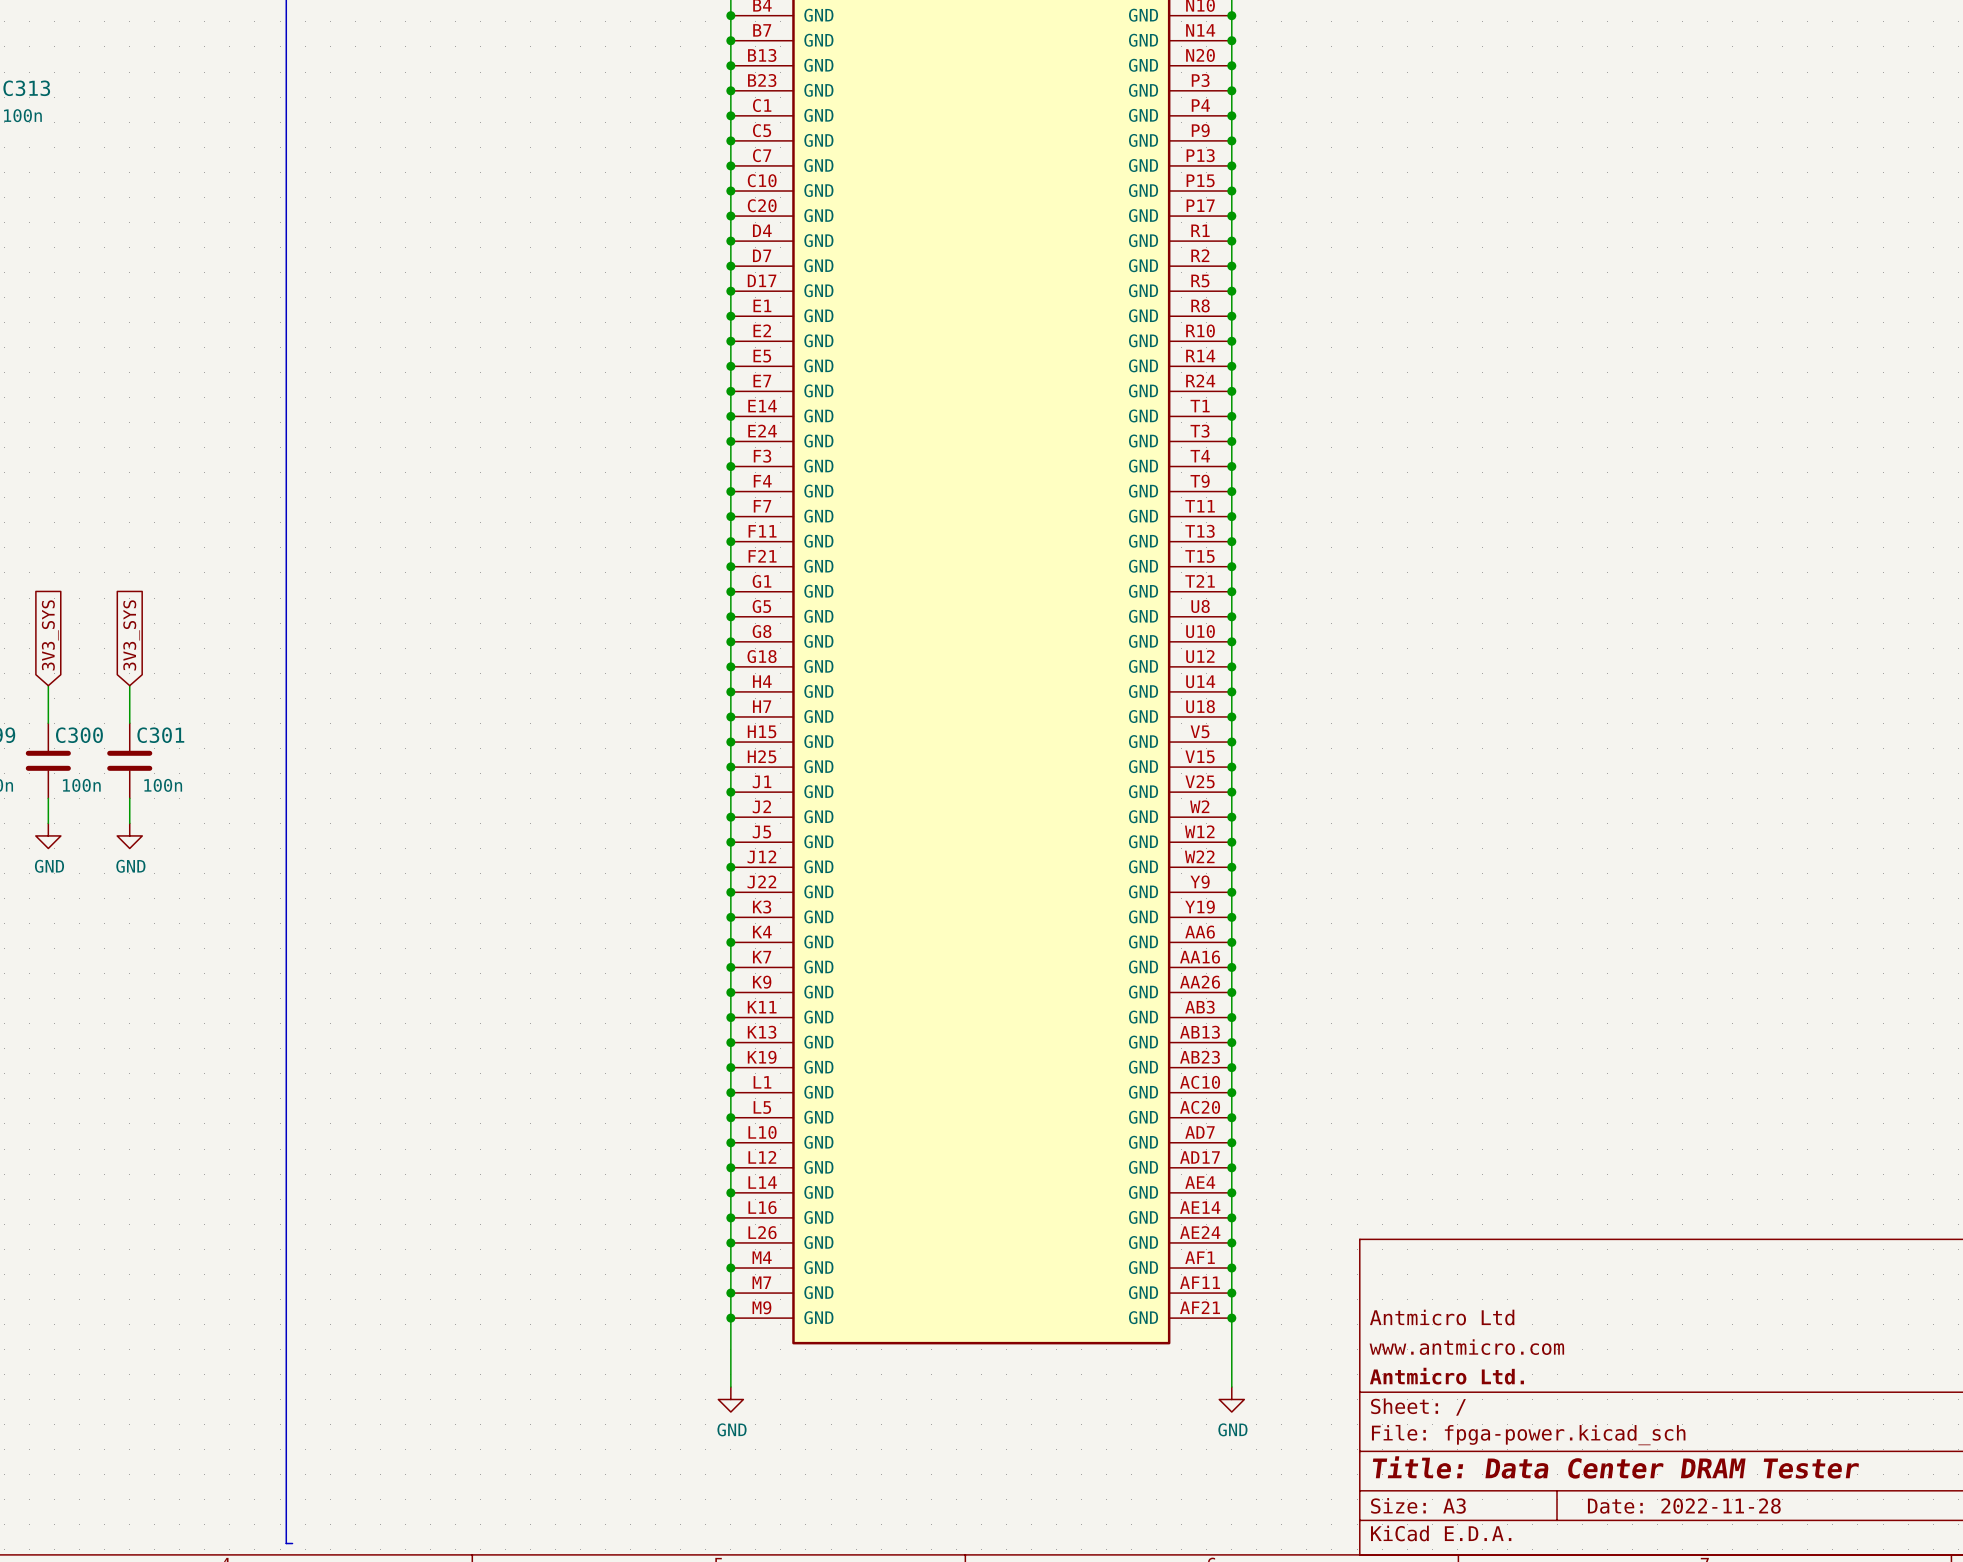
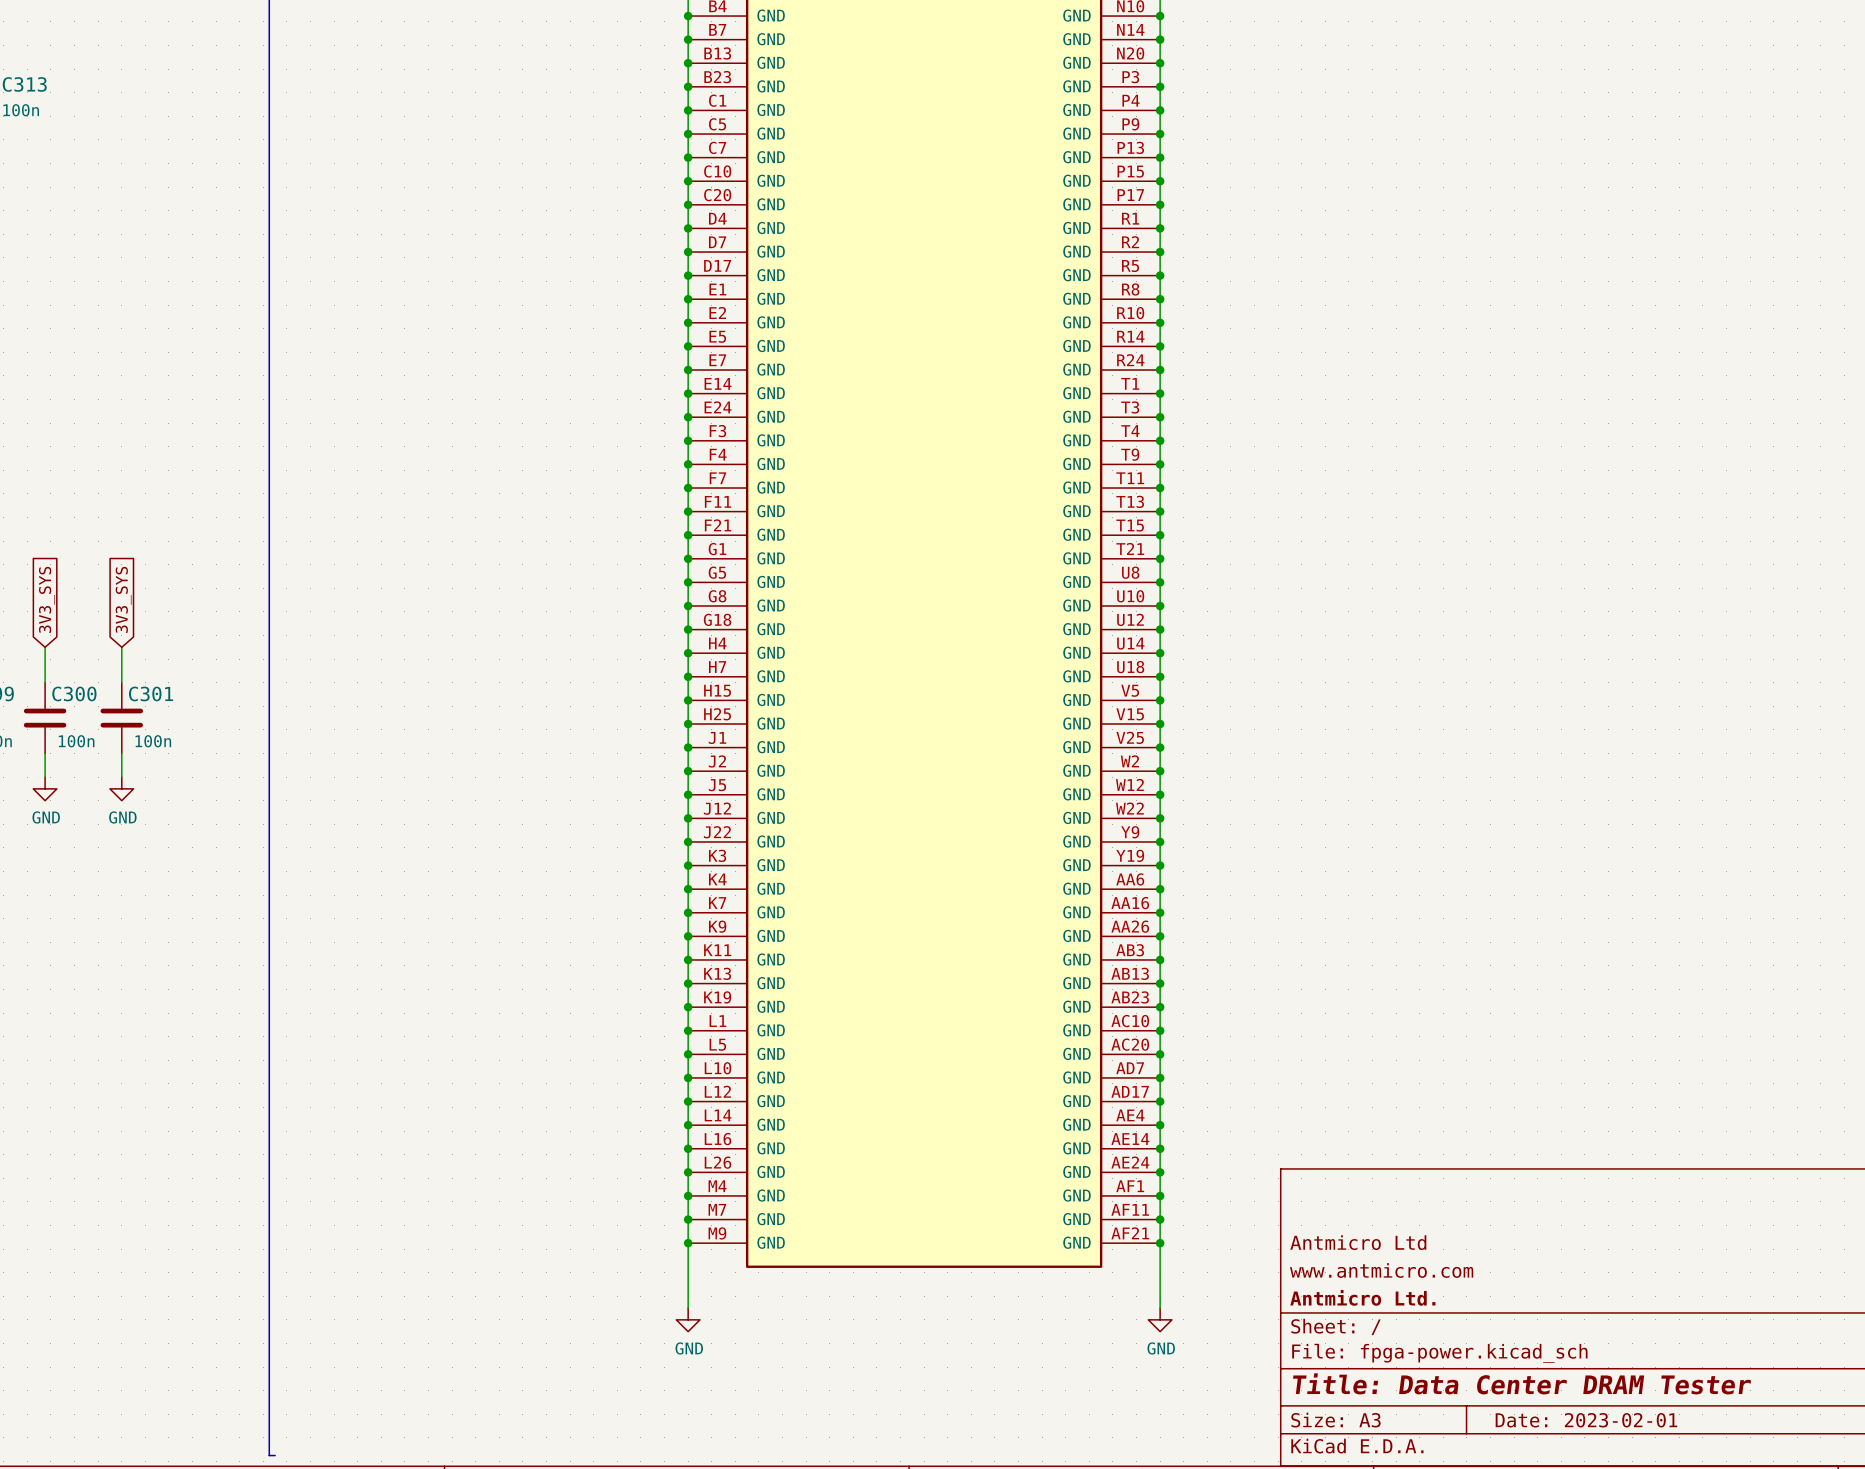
title block: Date: 2022-11-28 (1684, 1506) -> Date: 2023-02-01 (1586, 1420)

